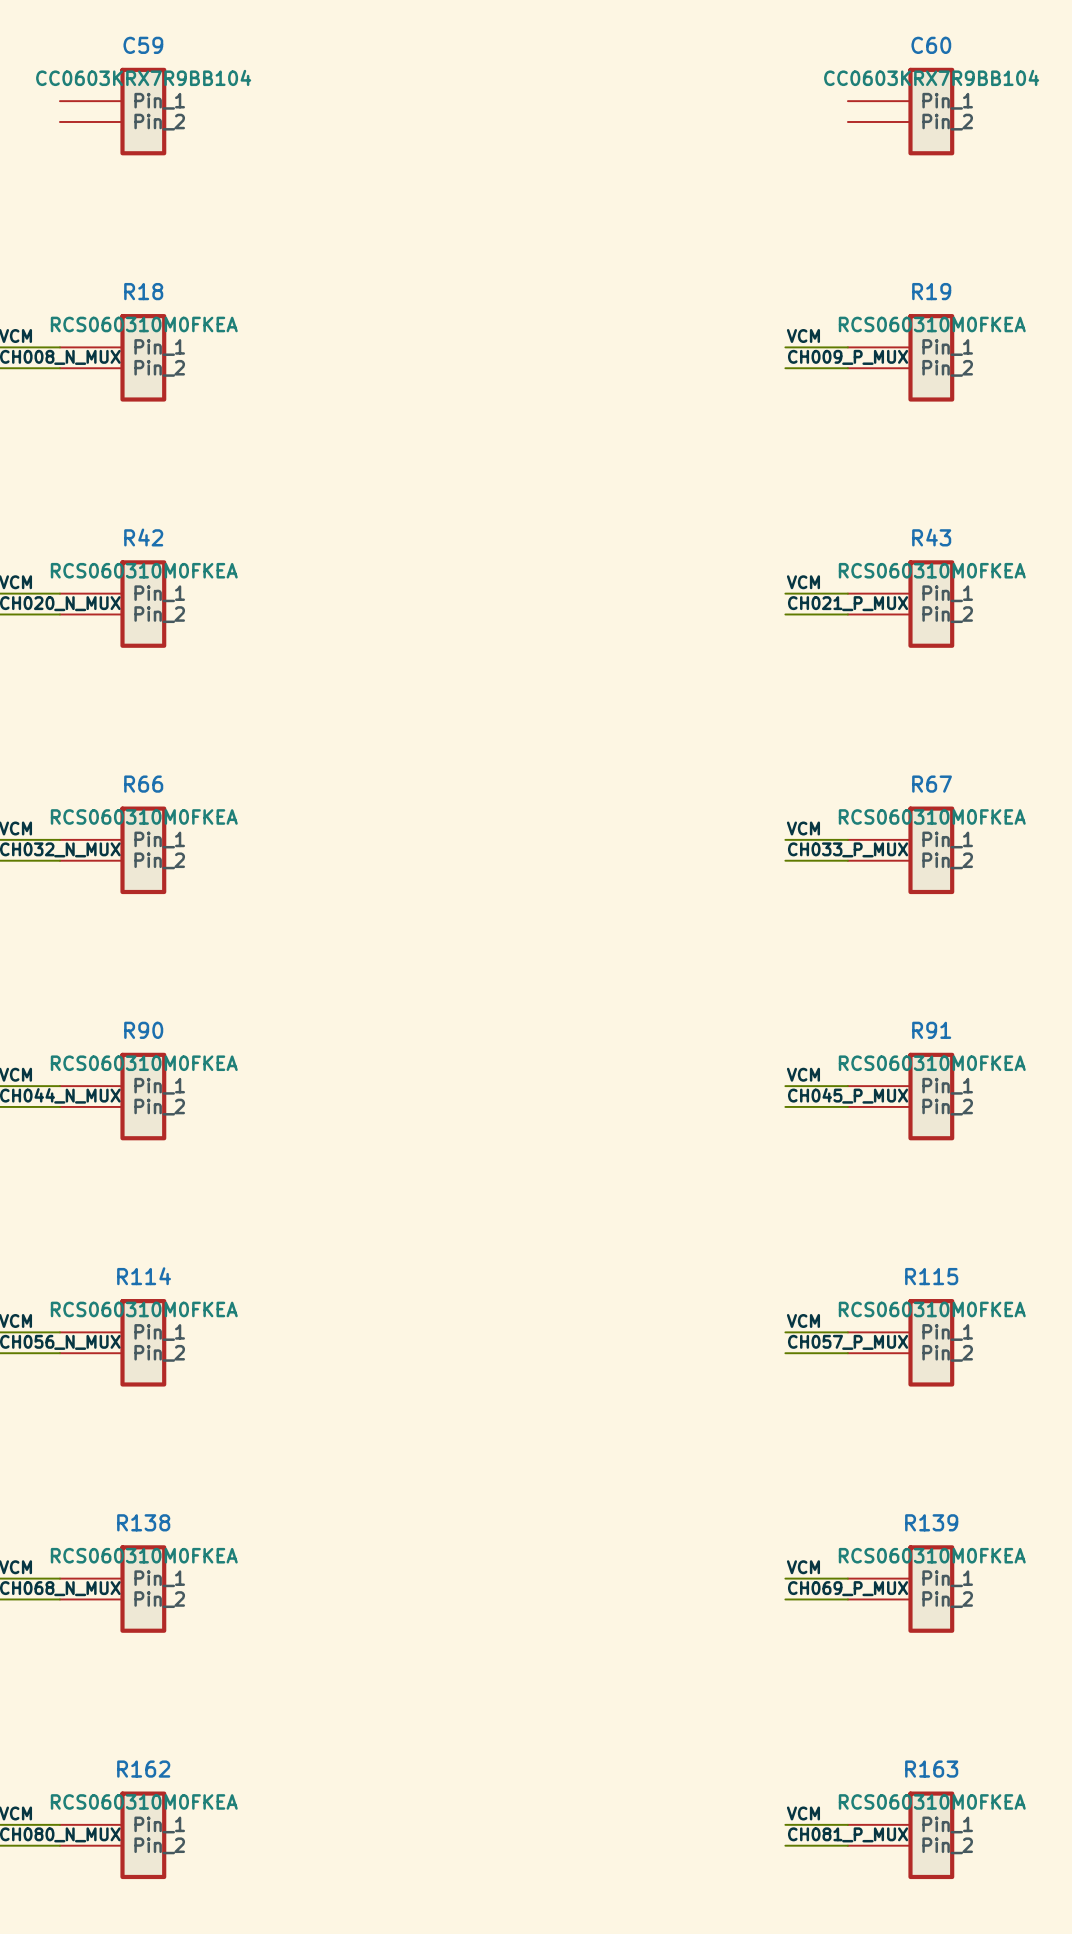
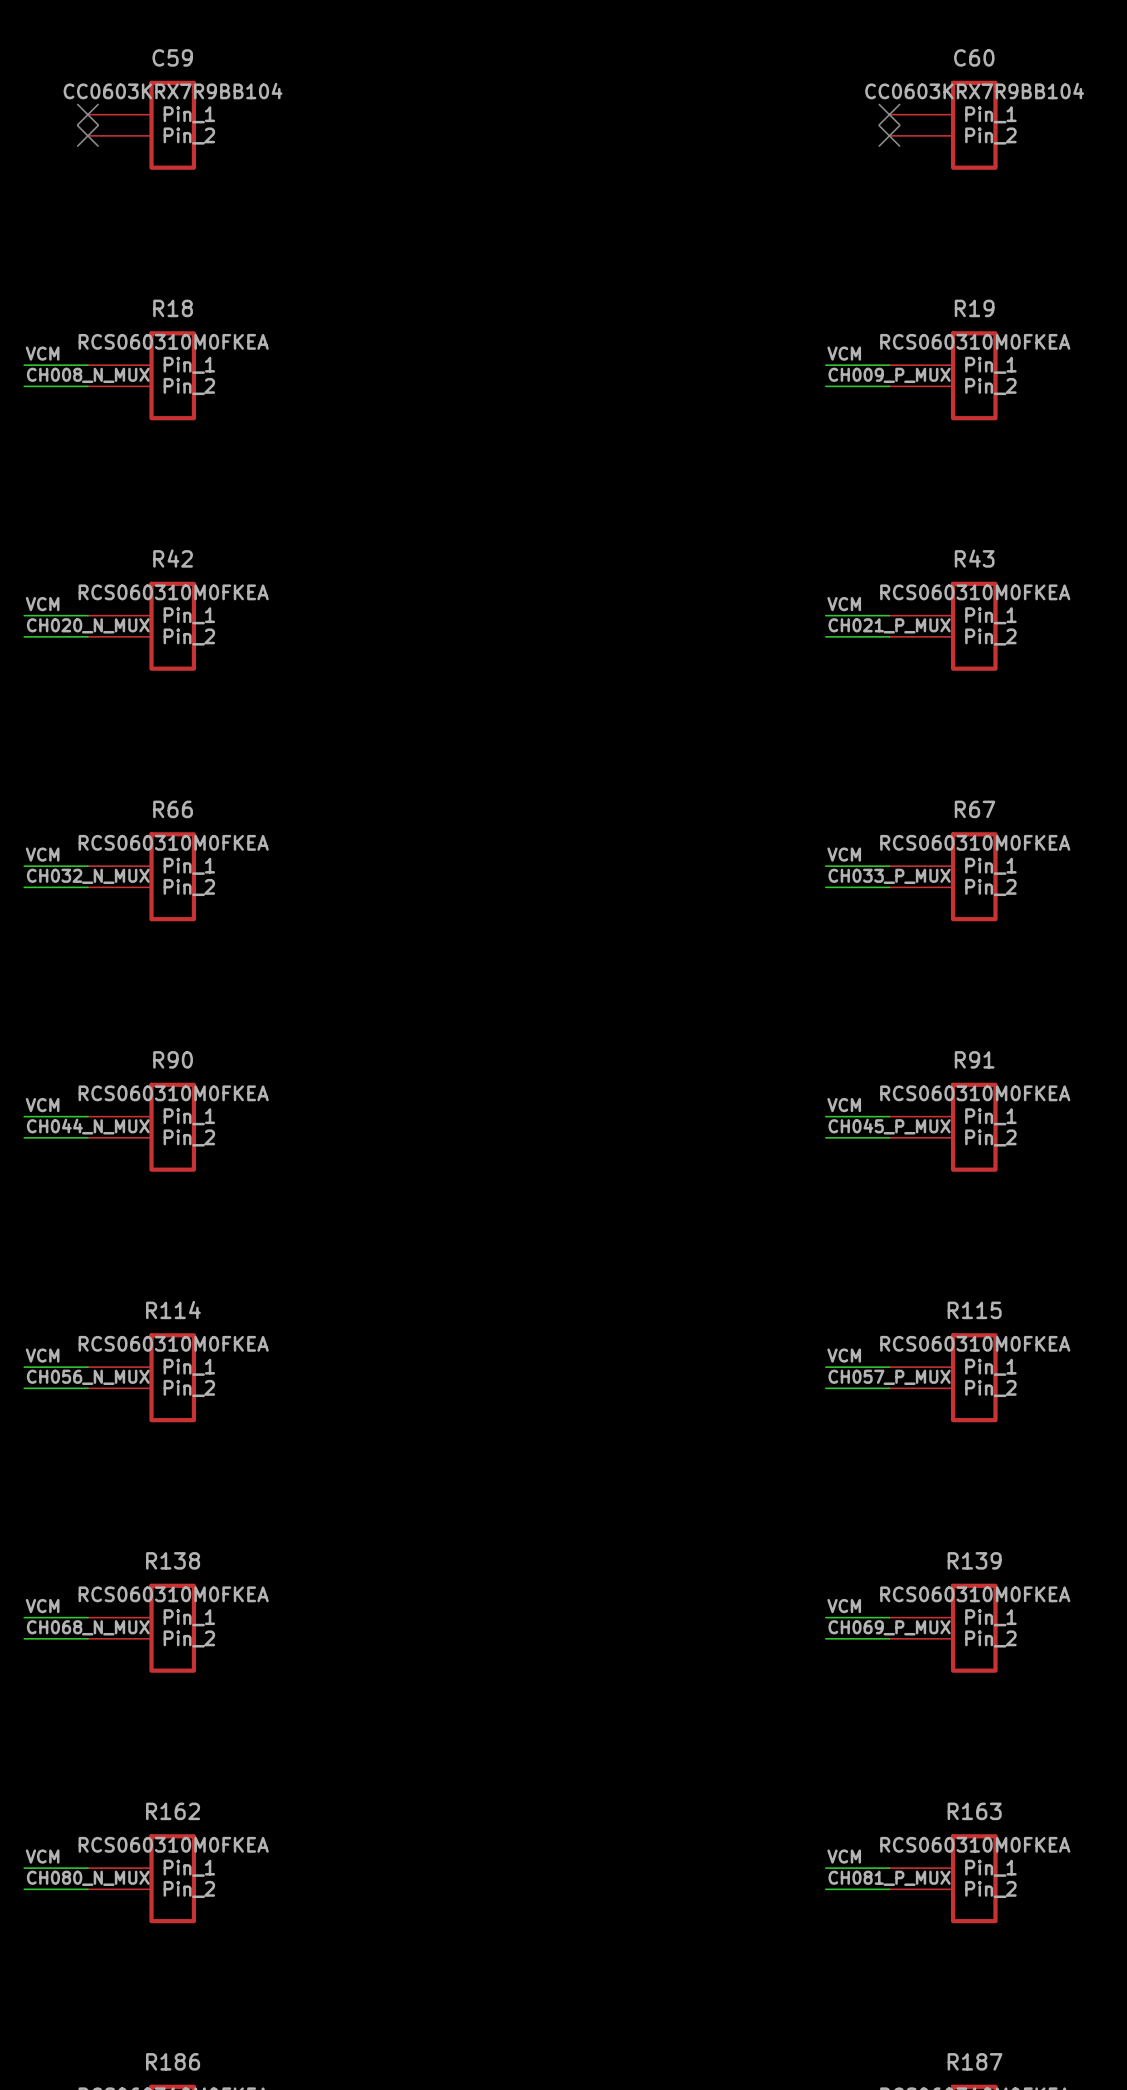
no-connect mark: none -> (87, 114)
no-connect mark: none -> (889, 114)
no-connect mark: none -> (87, 135)
no-connect mark: none -> (889, 135)

